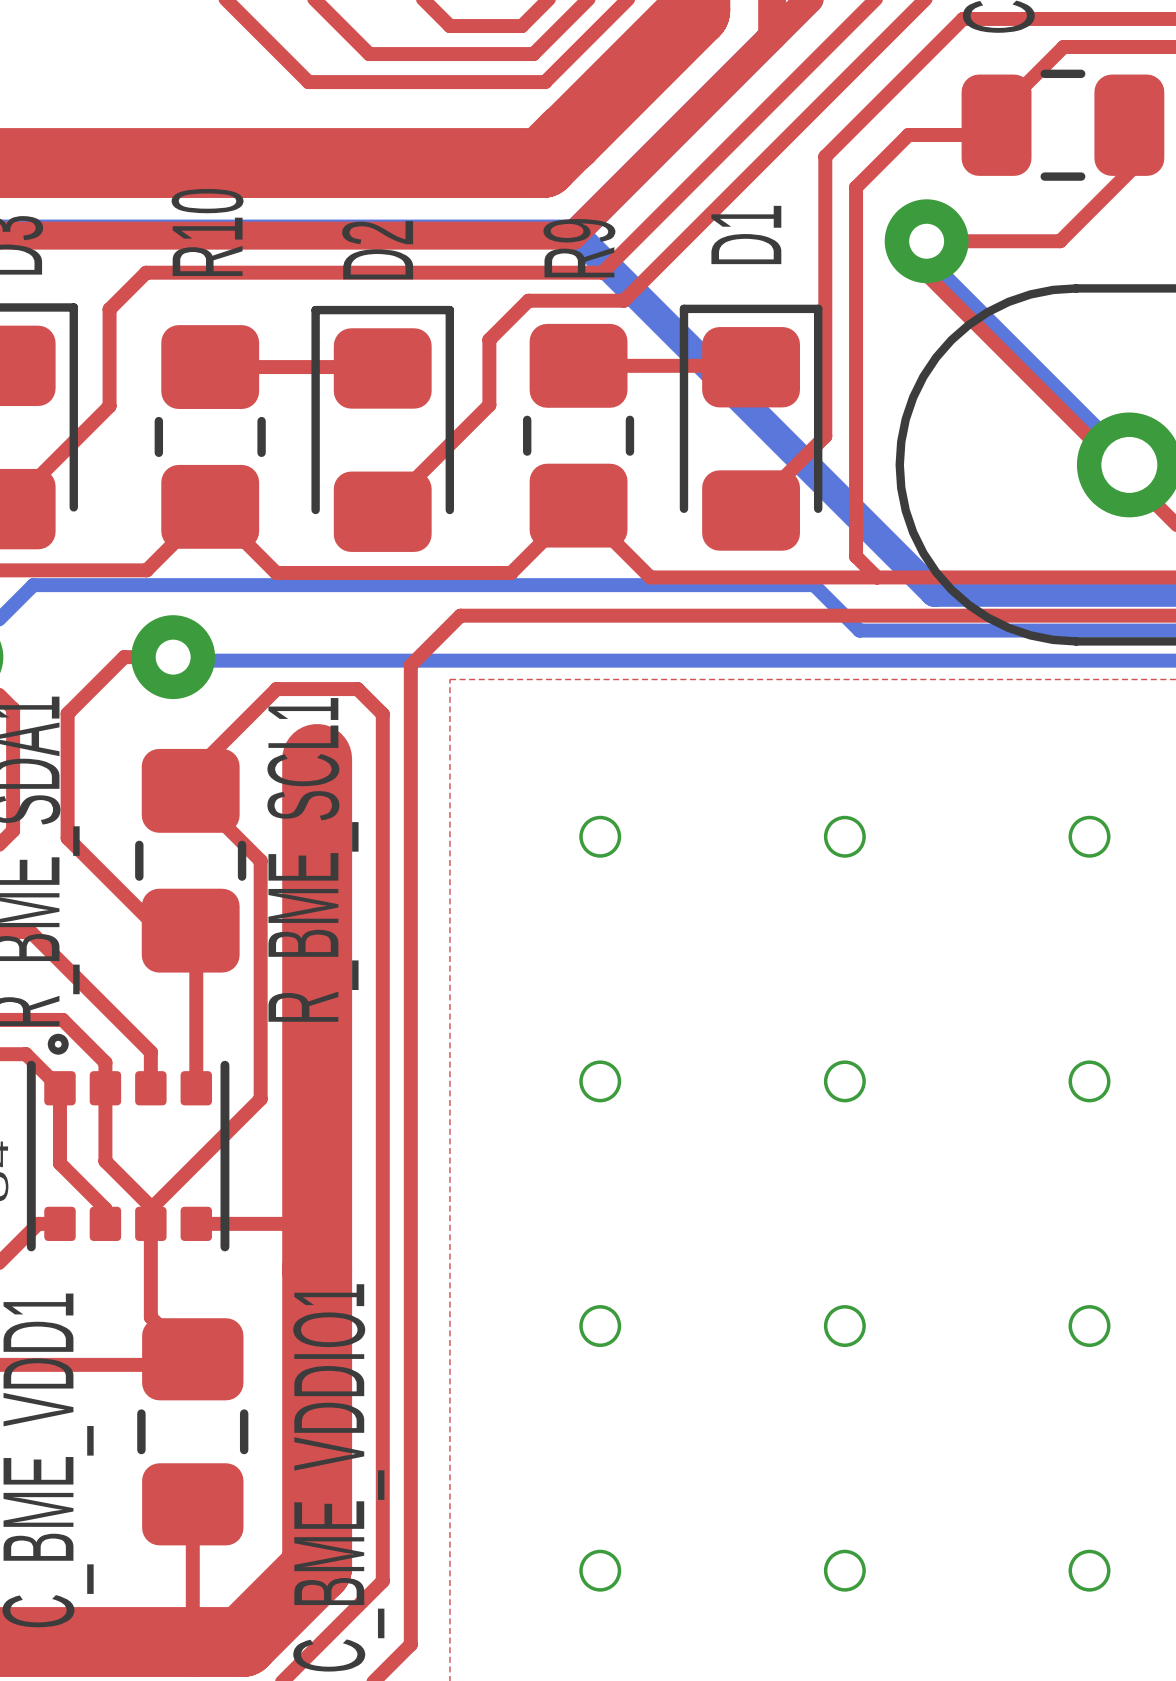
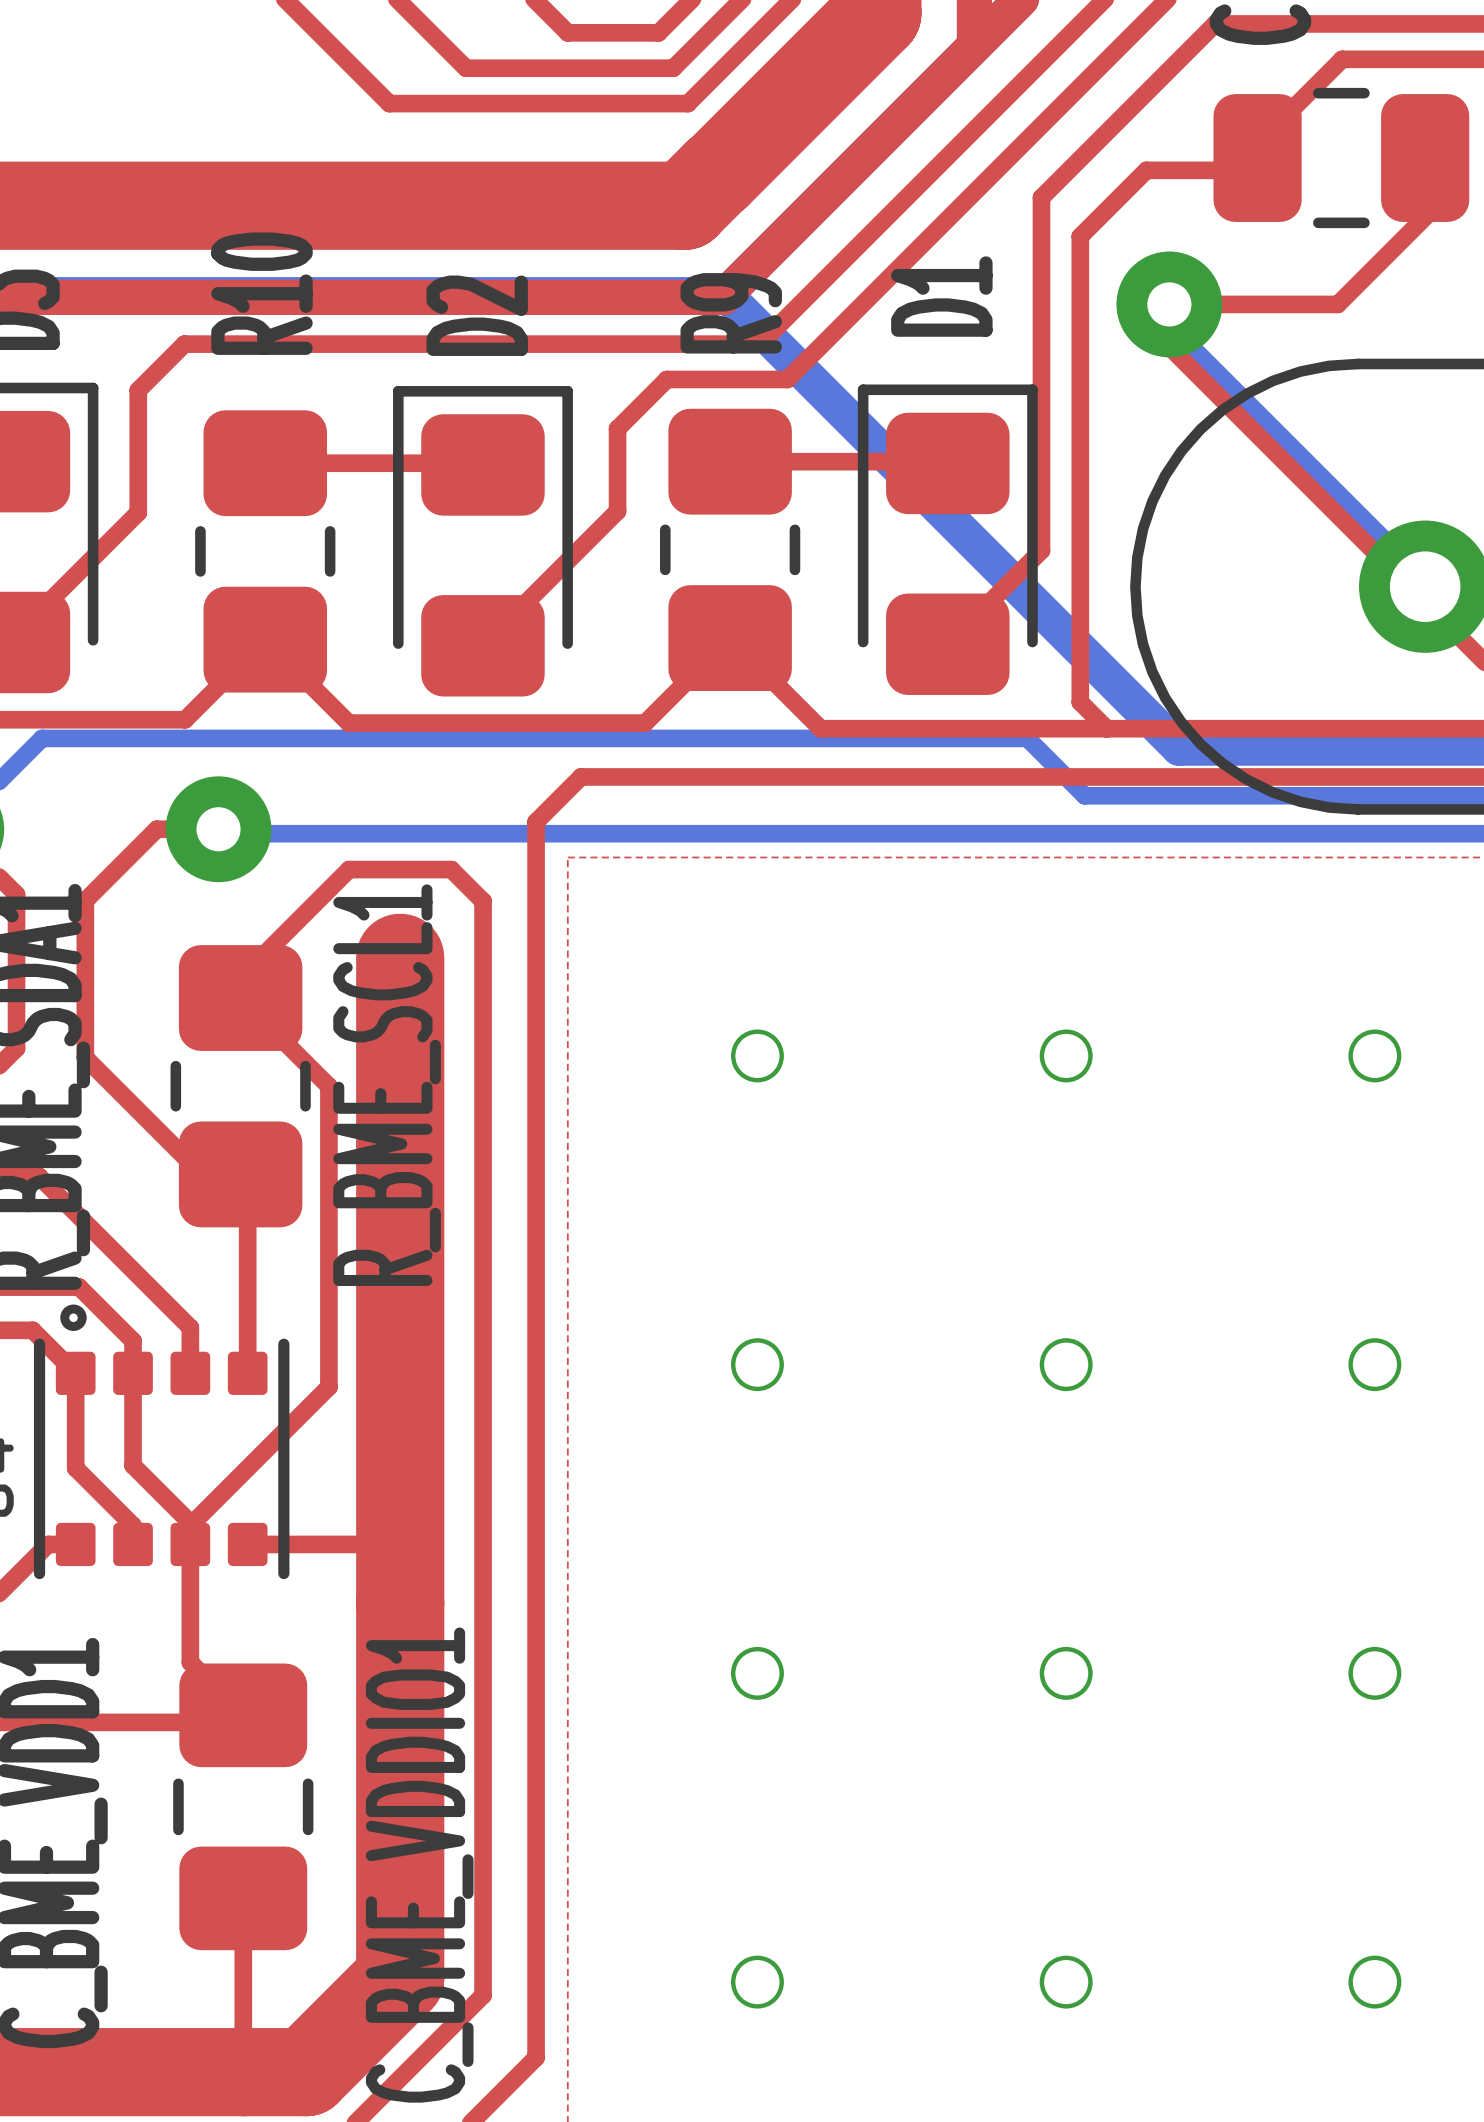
top track: (424, 651) (410, 665) (410, 1644) -> (536, 821) (536, 2057) (518, 2075)

